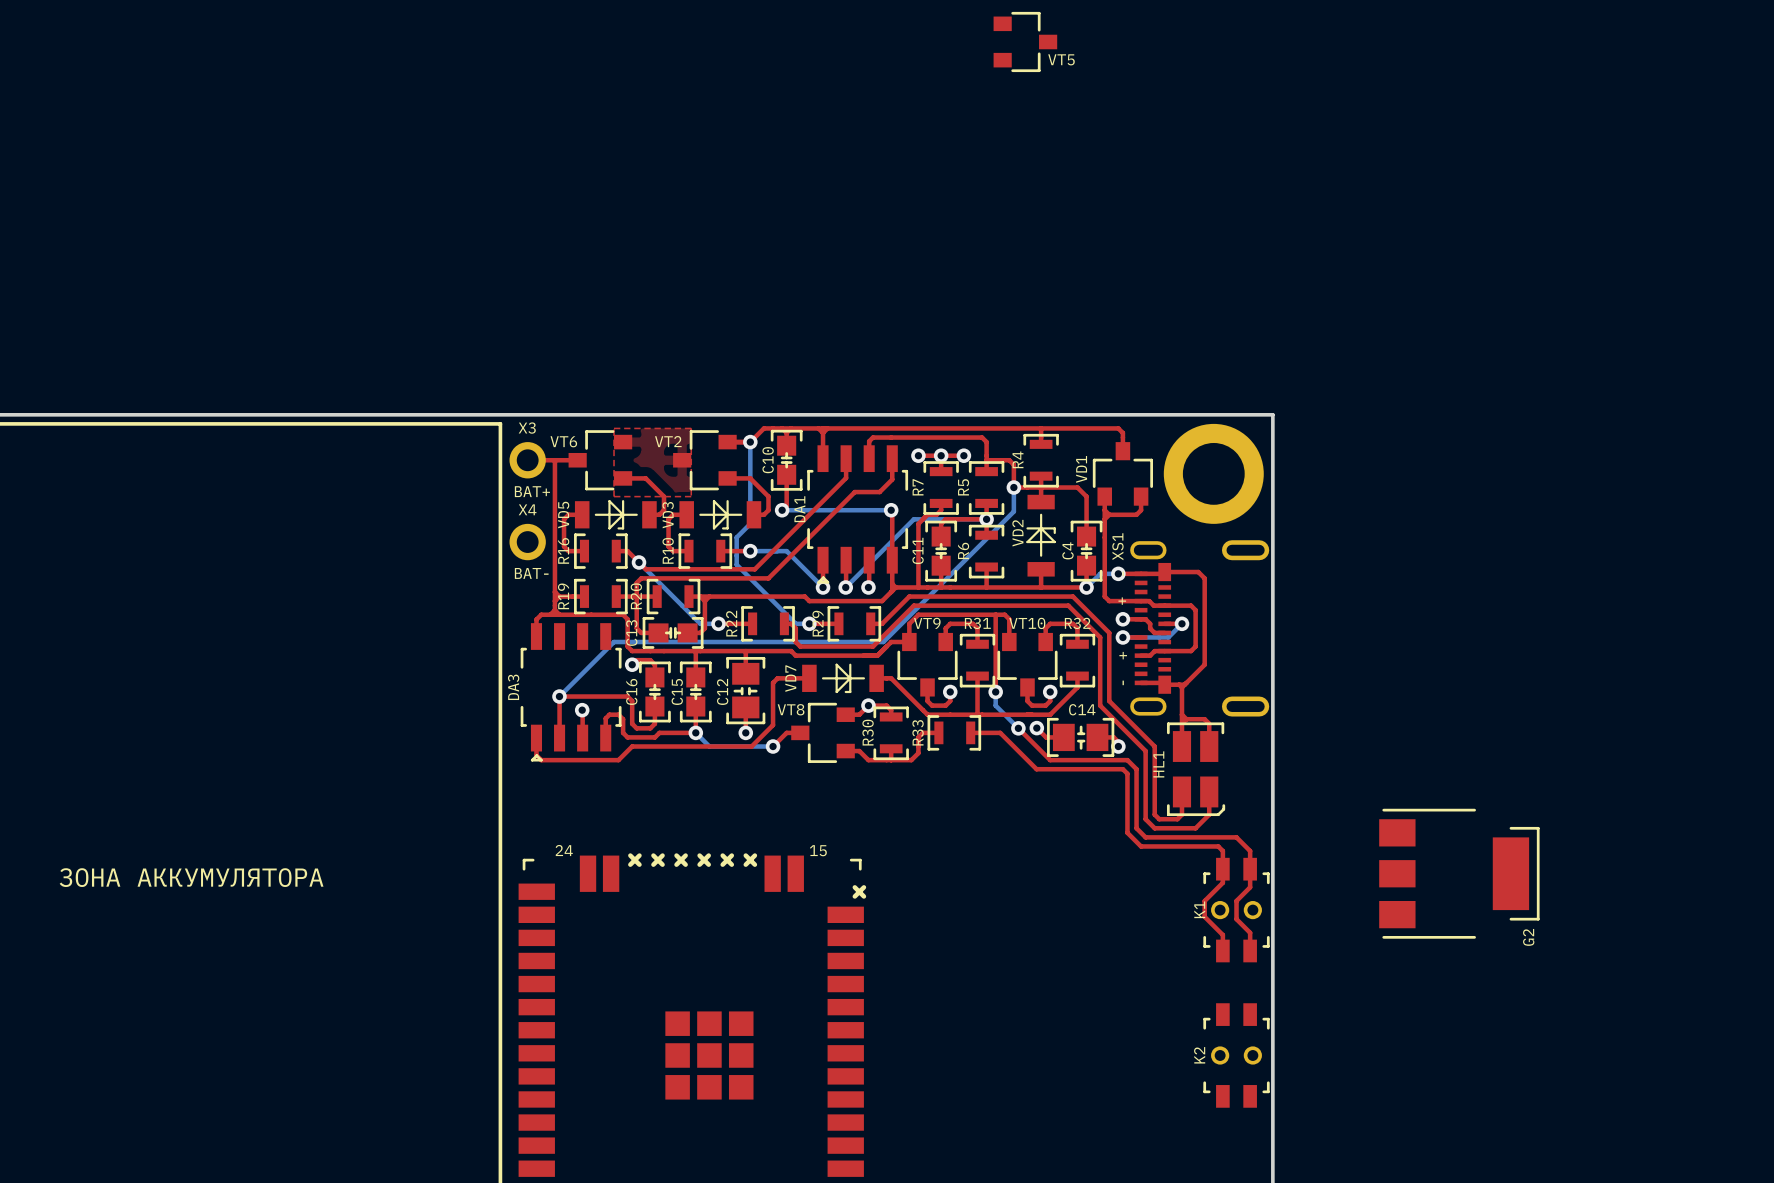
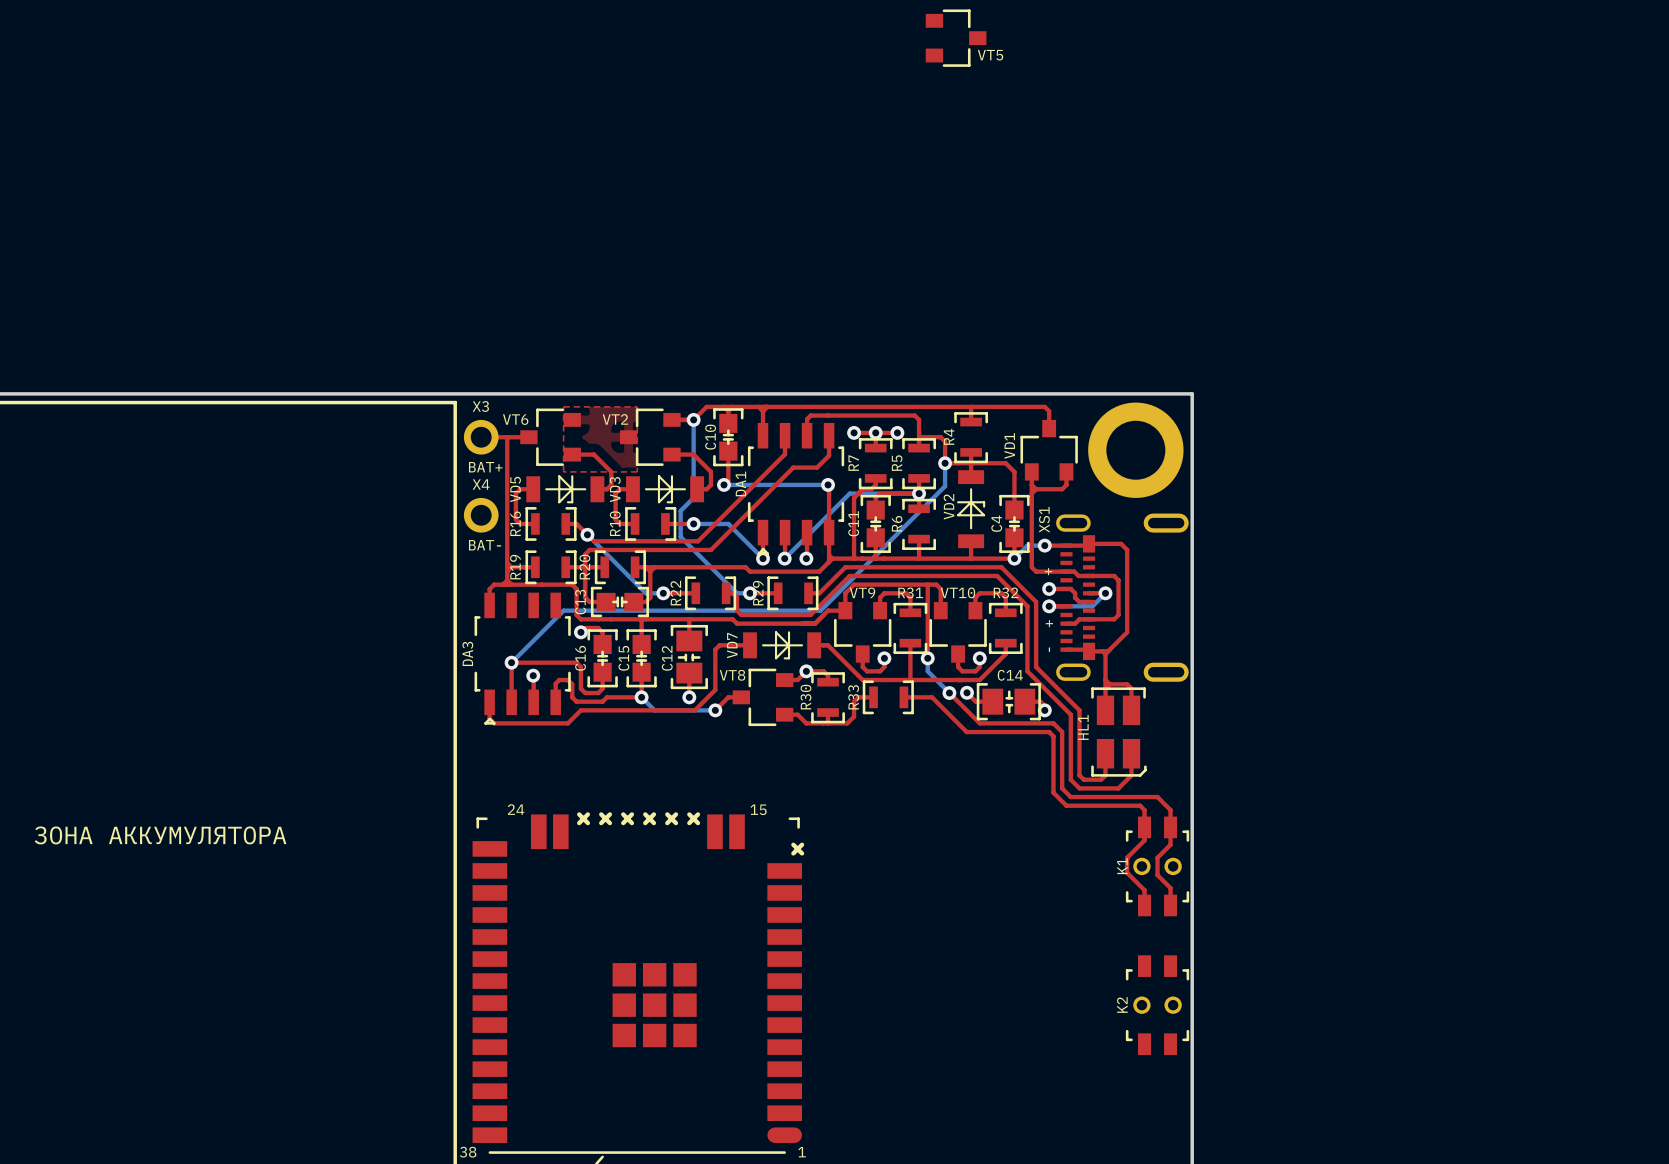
G2: (1459, 873) -> none

